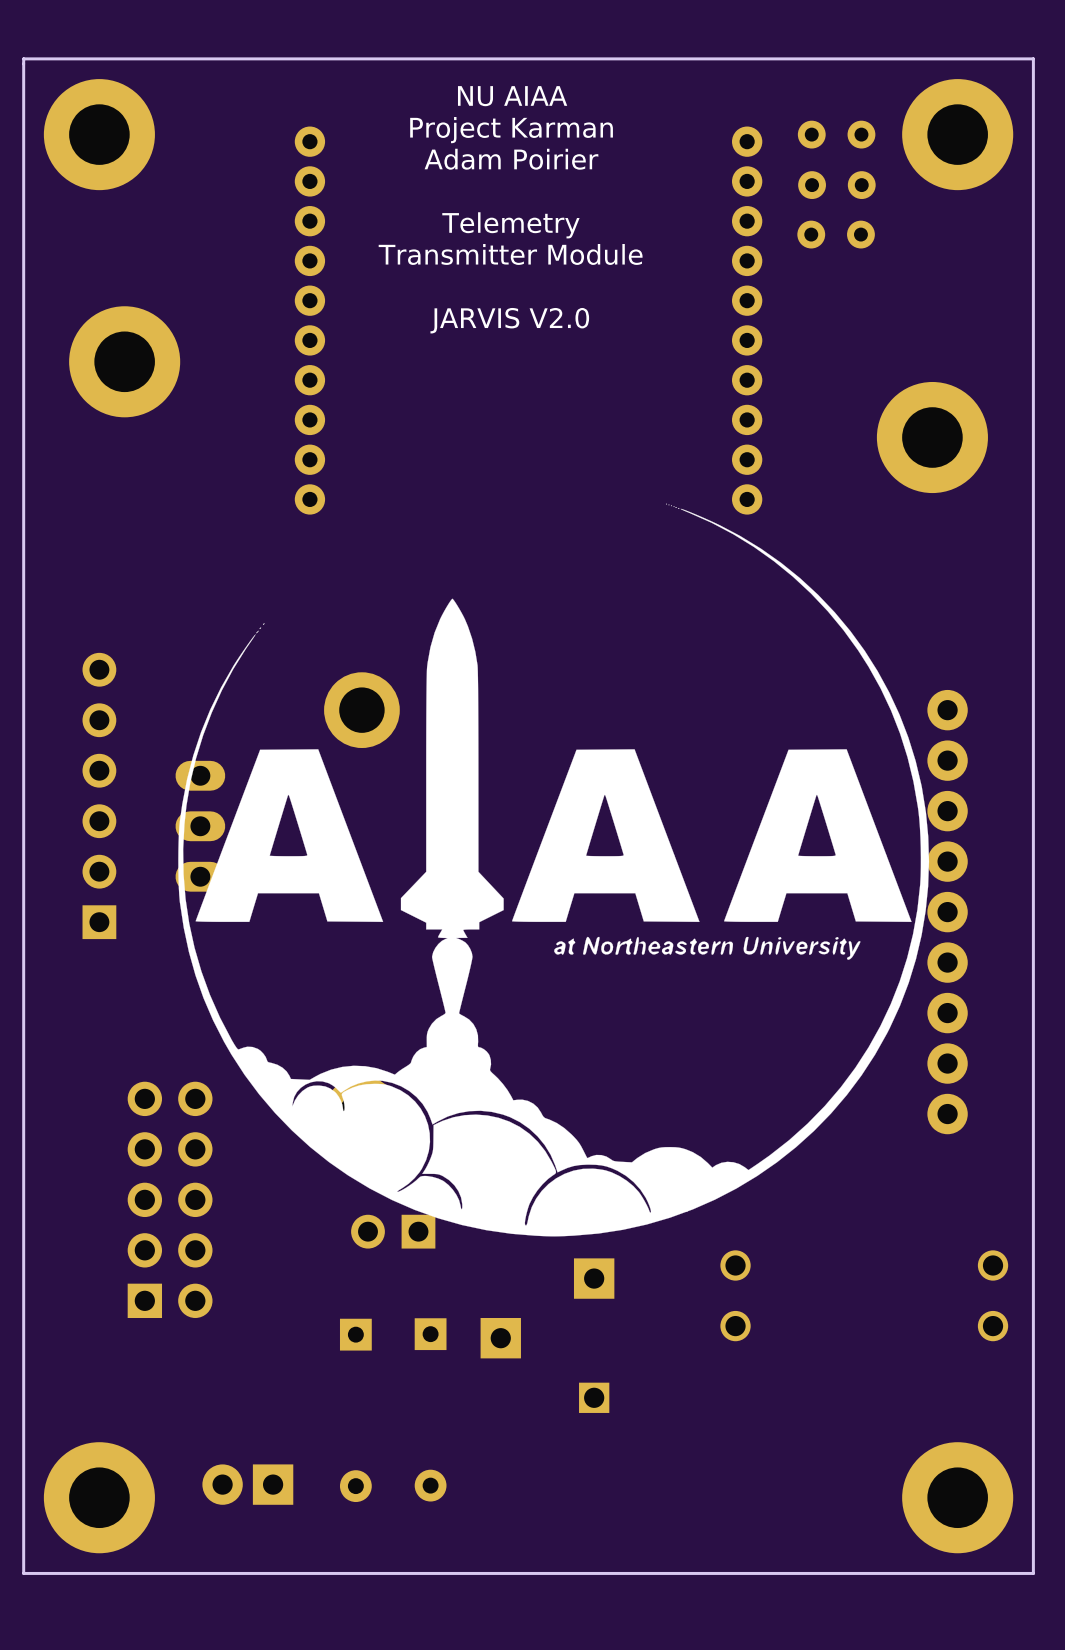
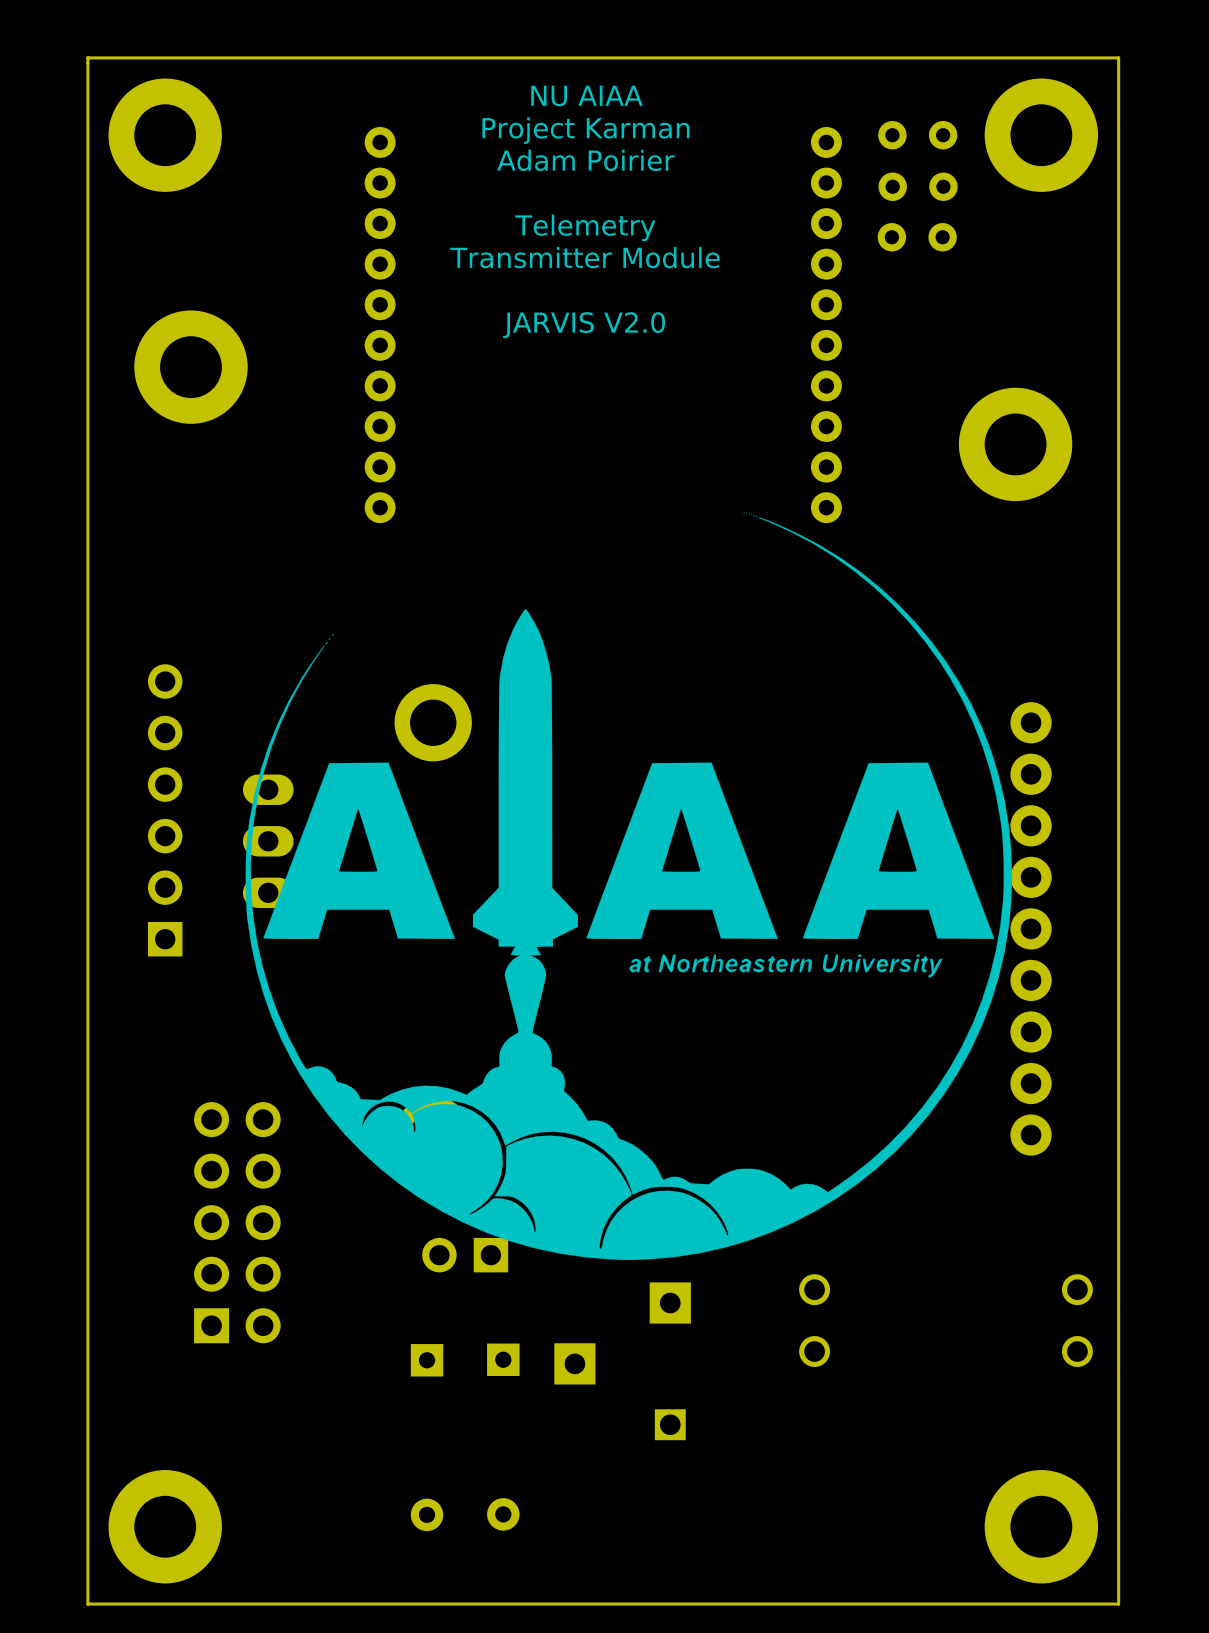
part: (247, 1484) -> none

